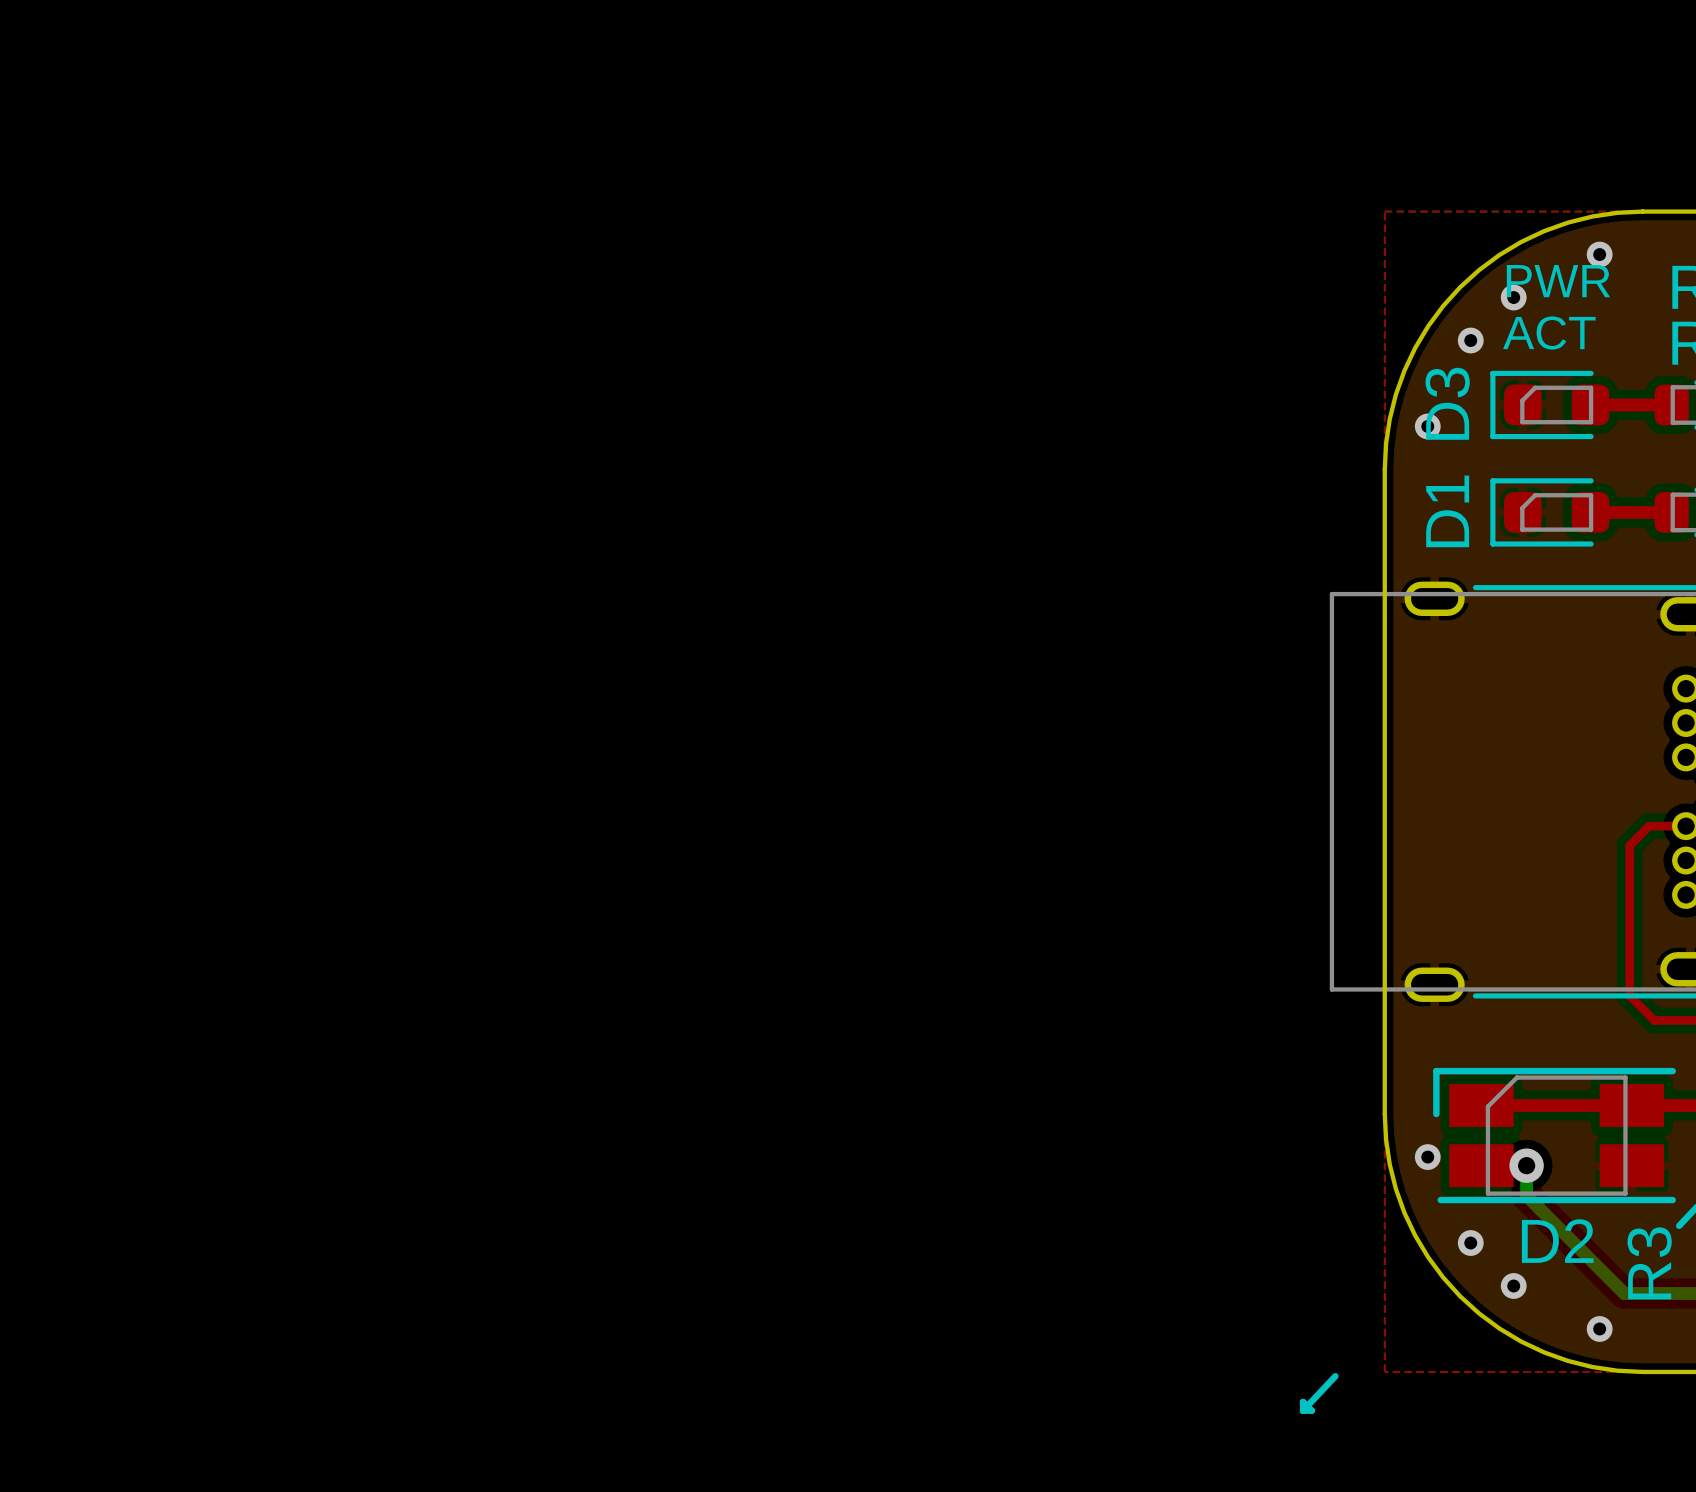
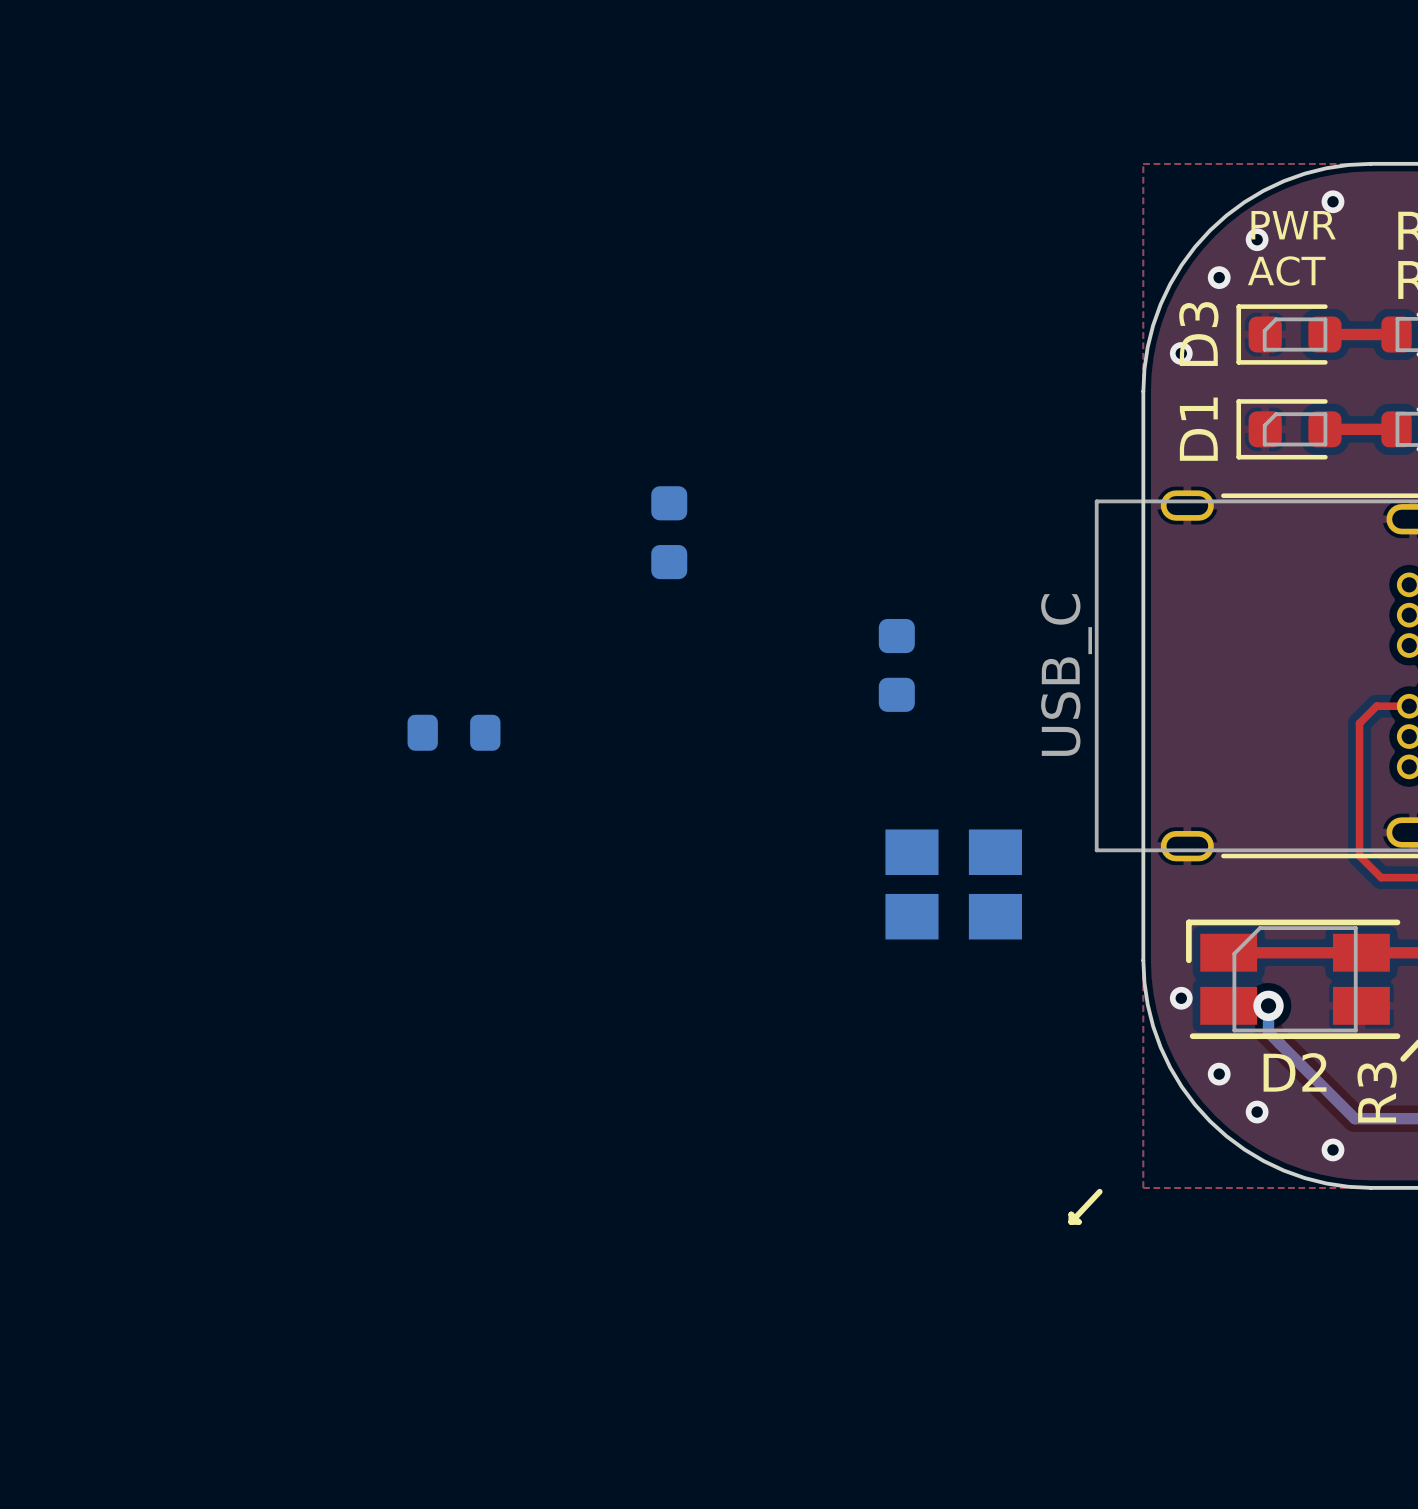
part: none -> (669, 532)
part: none -> (896, 665)
part value: none -> USB_C (1066, 675)
part: none -> (454, 732)
part: none -> (953, 884)

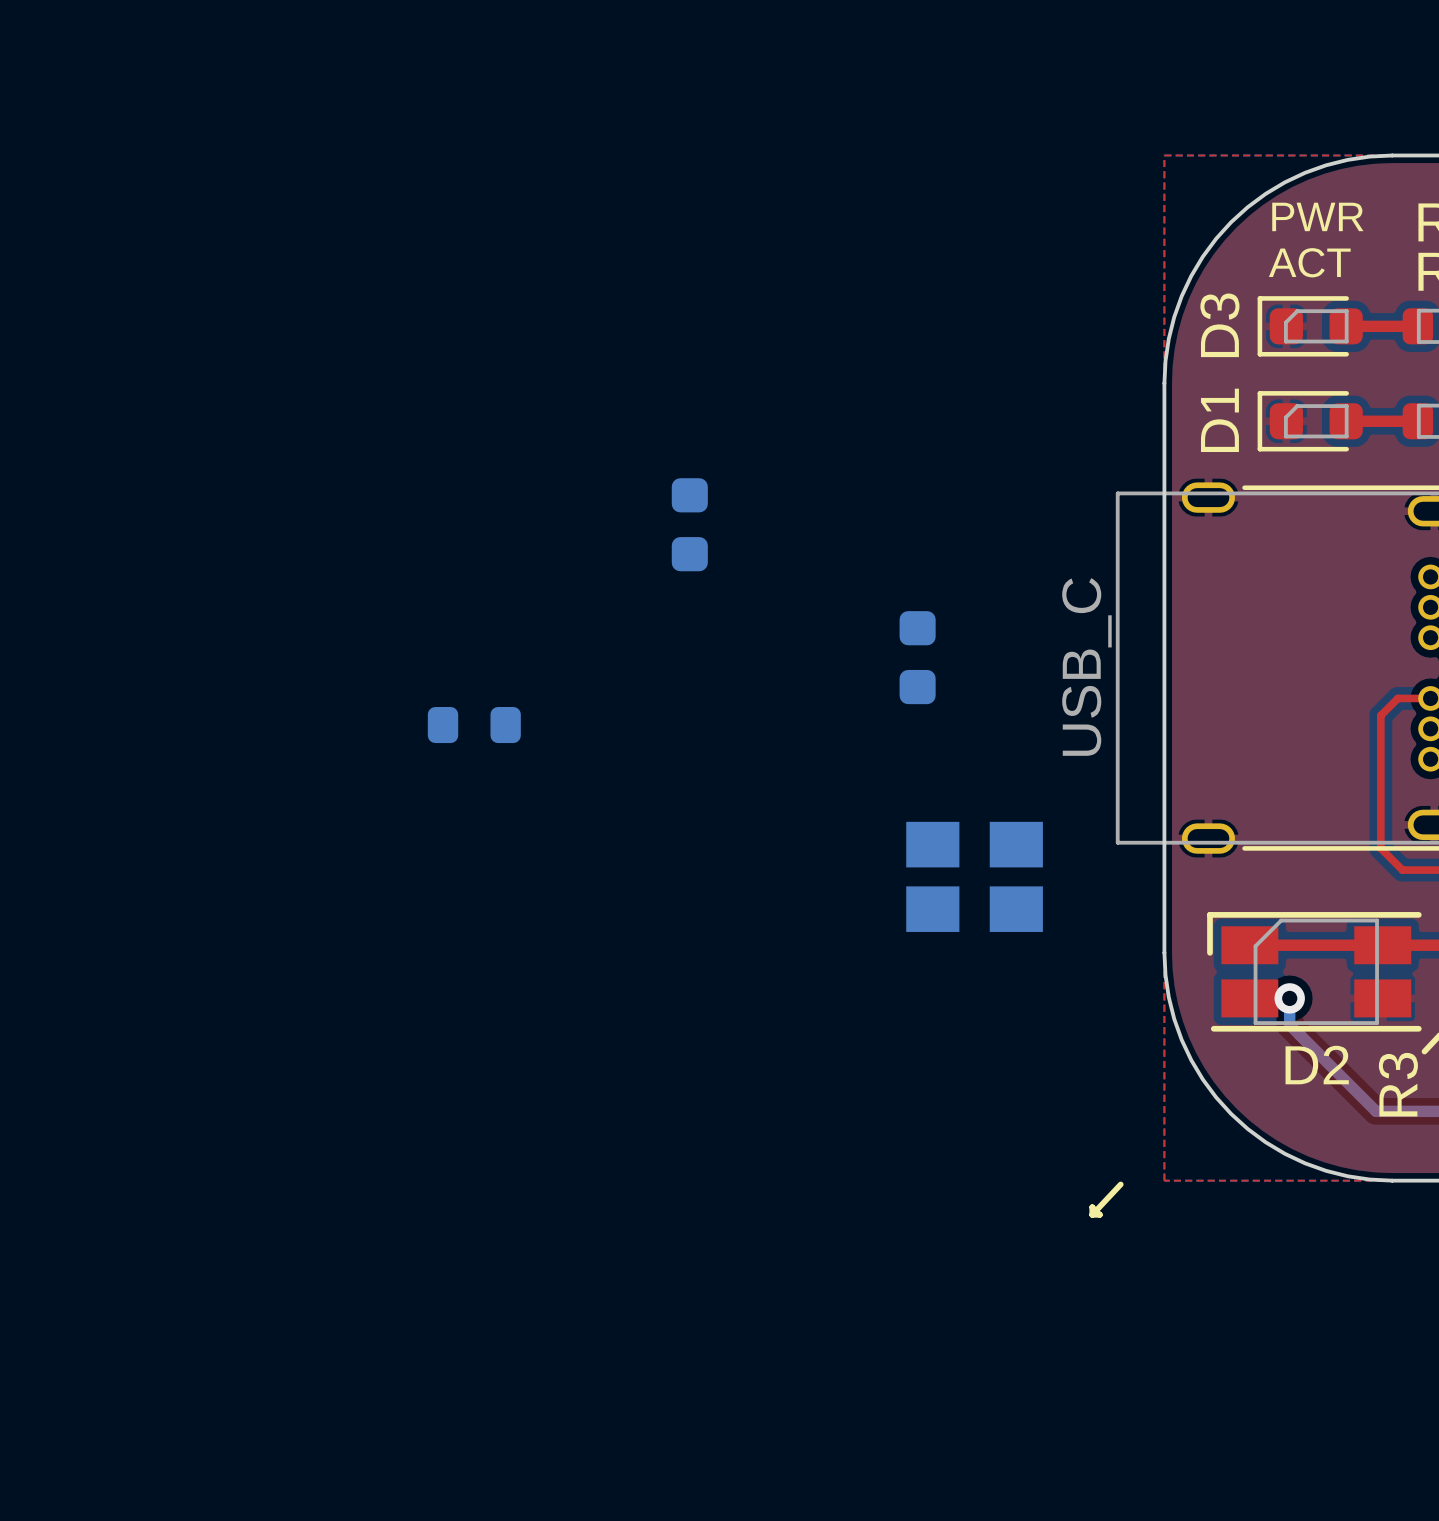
via: (1332, 201) -> none
via: (1257, 239) -> none
via: (1219, 277) -> none
via: (1181, 353) -> none
via: (1181, 998) -> none
via: (1219, 1074) -> none
via: (1257, 1112) -> none
via: (1332, 1149) -> none

